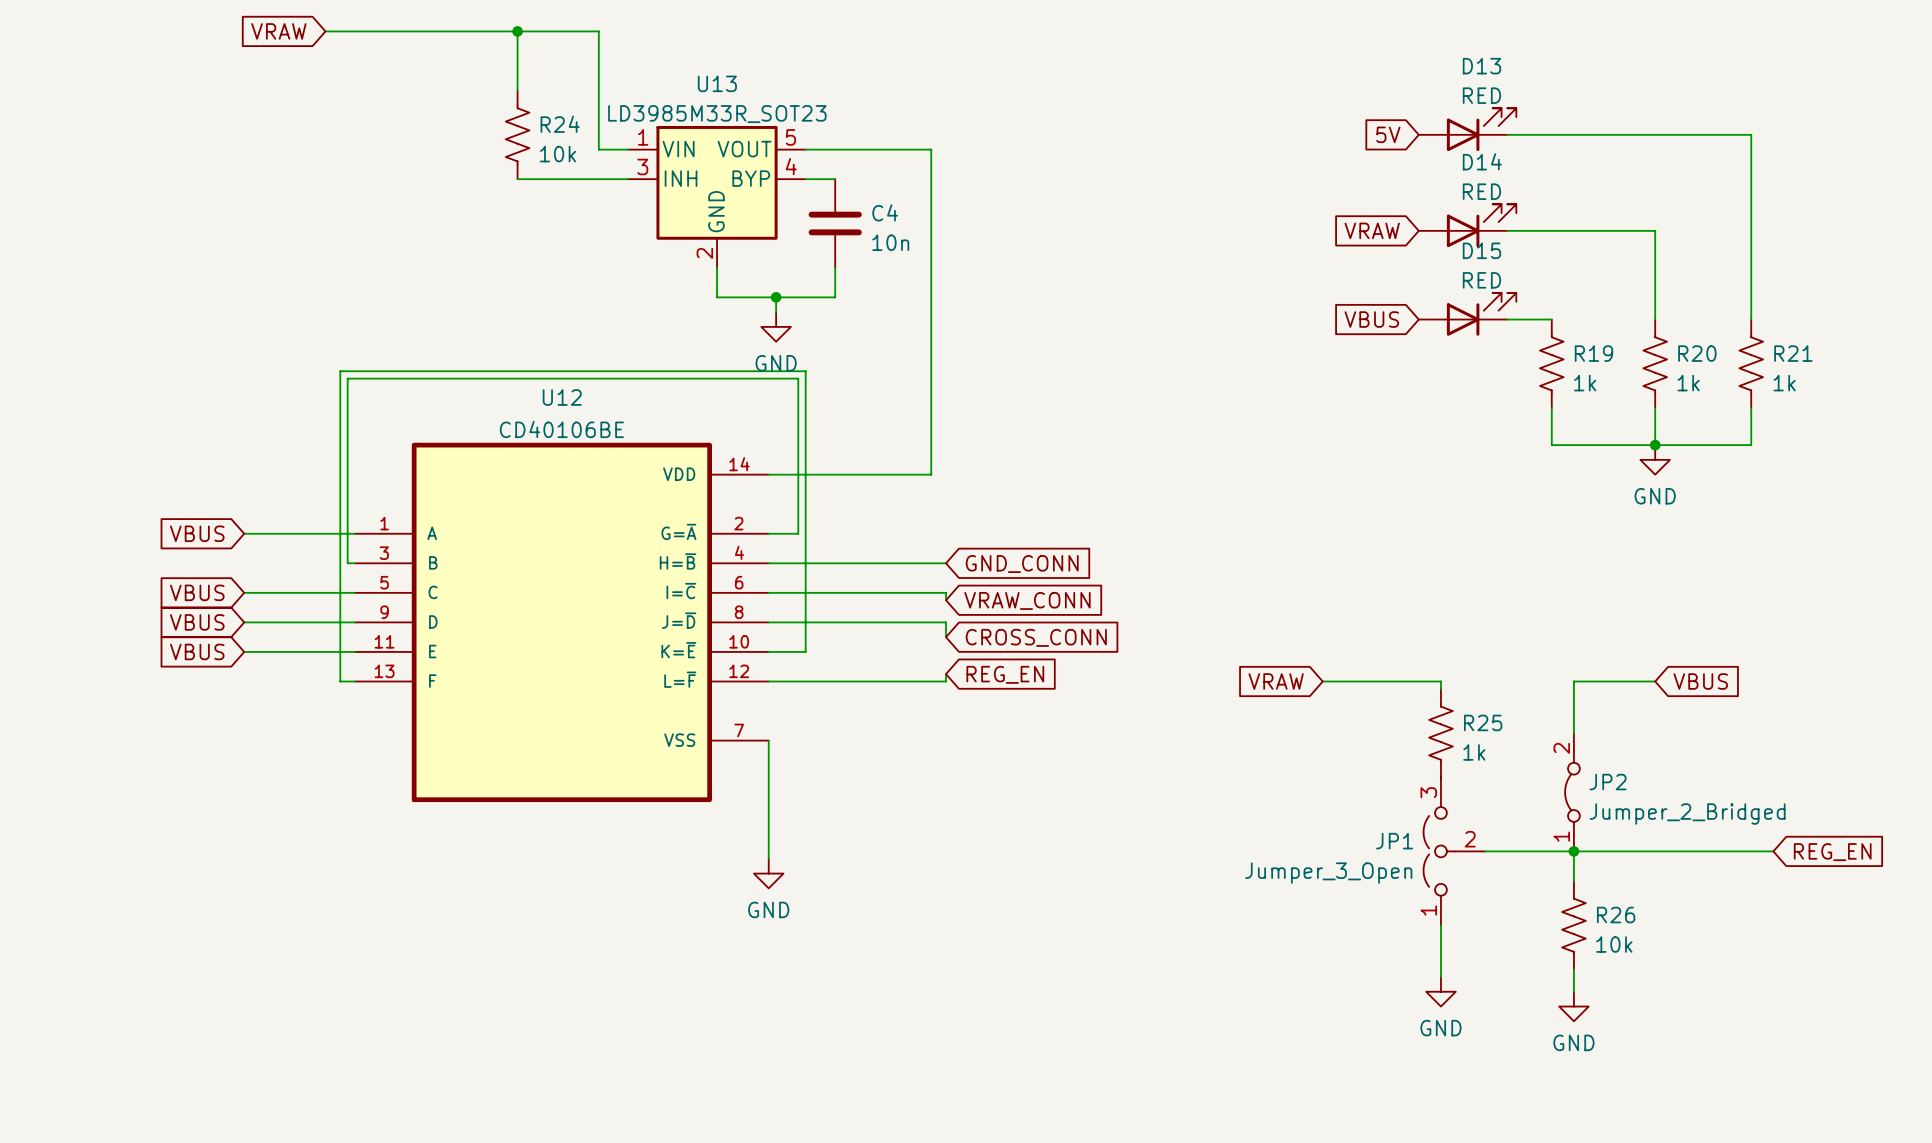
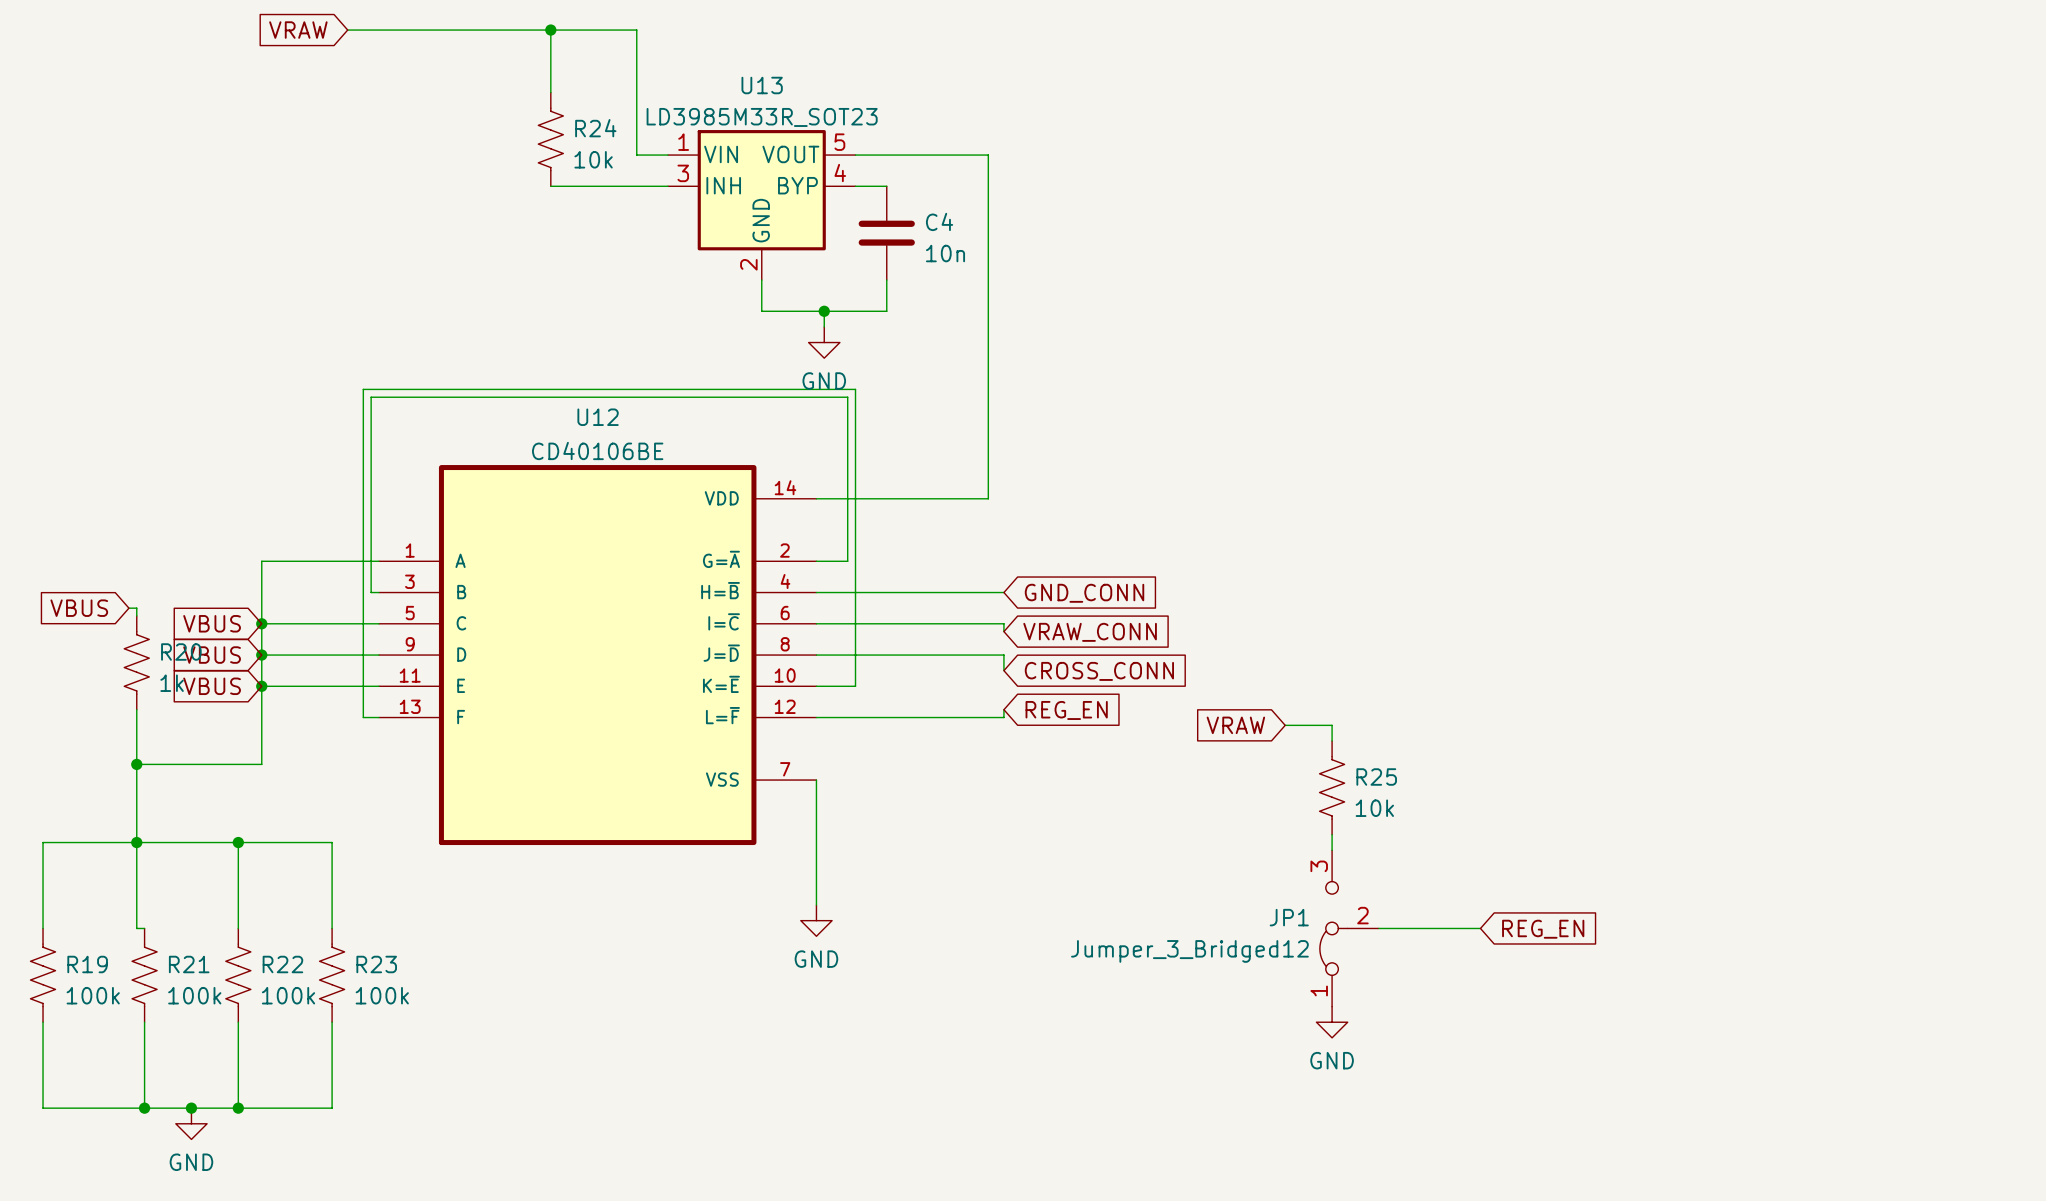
D13: RED (1467, 129) -> none
global label: 5V (1388, 134) -> none
wire: (1507, 134) (1751, 134) (1751, 319) -> none
D14: RED (1467, 225) -> none
global label: VRAW (1372, 230) -> none
wire: (1507, 230) (1655, 230) (1655, 319) -> none
D15: RED (1467, 314) -> none
global label: VBUS (1371, 319) -> none
wire: (1507, 319) (1551, 319) -> none
R19 position: (1551, 363) -> (43, 975)
R20 position: (1655, 363) -> (136, 662)
R21 position: (1751, 363) -> (144, 975)
R19 value: 1k (1585, 383) -> 100k (93, 995)
R21 value: 1k (1784, 383) -> 100k (194, 995)
wire: (1551, 408) (1551, 445) (1751, 445) (1751, 408) -> none
wire: (1655, 408) (1655, 445) -> none
junction: (1655, 445) -> none
power symbol: GND (1655, 459) -> none
global label position: VBUS (197, 533) -> VBUS (79, 608)
wire: none -> (261, 561) (261, 764) (136, 764)
wire: none -> (128, 608) (136, 608) (136, 615)
junction: none -> (261, 623)
junction: none -> (261, 655)
junction: none -> (261, 686)
wire: none -> (136, 709) (136, 928) (144, 928)
global label position: VRAW (1276, 681) -> VRAW (1235, 725)
wire: (1322, 681) (1440, 681) (1440, 688) -> none
wire: (1655, 681) (1573, 681) (1573, 733) -> none
global label: VBUS (1700, 681) -> none
wire: none -> (1285, 725) (1332, 725) (1332, 740)
junction: none -> (136, 764)
R25 position: (1440, 733) -> (1332, 787)
R25 value: 1k (1474, 752) -> 10k (1374, 808)
JP1 symbol: [1423, 777, 1486, 926] -> [1319, 850, 1379, 1007]
wire: none -> (1332, 834) (1332, 850)
JP2: Jumper_2_Bridged (1572, 792) -> none
junction: none -> (136, 842)
wire: none -> (238, 842) (238, 928)
junction: none -> (238, 842)
wire: (1485, 851) (1773, 851) -> none
wire: (1573, 851) (1573, 880) -> none
junction: (1573, 851) -> none
global label: REG_EN (1832, 852) -> none
JP1 value: Jumper_3_Open (1328, 873) -> Jumper_3_Bridged12 (1189, 951)
wire: none -> (43, 928) (43, 842) (332, 842) (332, 928)
wire: none -> (1378, 928) (1480, 928)
global label: none -> REG_EN (1543, 929)
R22: none -> 100k (238, 975)
R23: none -> 100k (332, 975)
wire: (1440, 925) (1440, 976) -> none
R26: 10k (1573, 925) -> none
wire: none -> (43, 1022) (43, 1108) (332, 1108) (332, 1022)
wire: none -> (144, 1022) (144, 1108)
wire: none -> (238, 1022) (238, 1108)
power symbol: none -> GND (1332, 1022)
wire: (1573, 969) (1573, 991) -> none
power symbol: GND (1440, 991) -> none
power symbol: GND (1573, 1006) -> none
junction: none -> (144, 1108)
junction: none -> (191, 1108)
junction: none -> (238, 1108)
power symbol: none -> GND (191, 1123)

